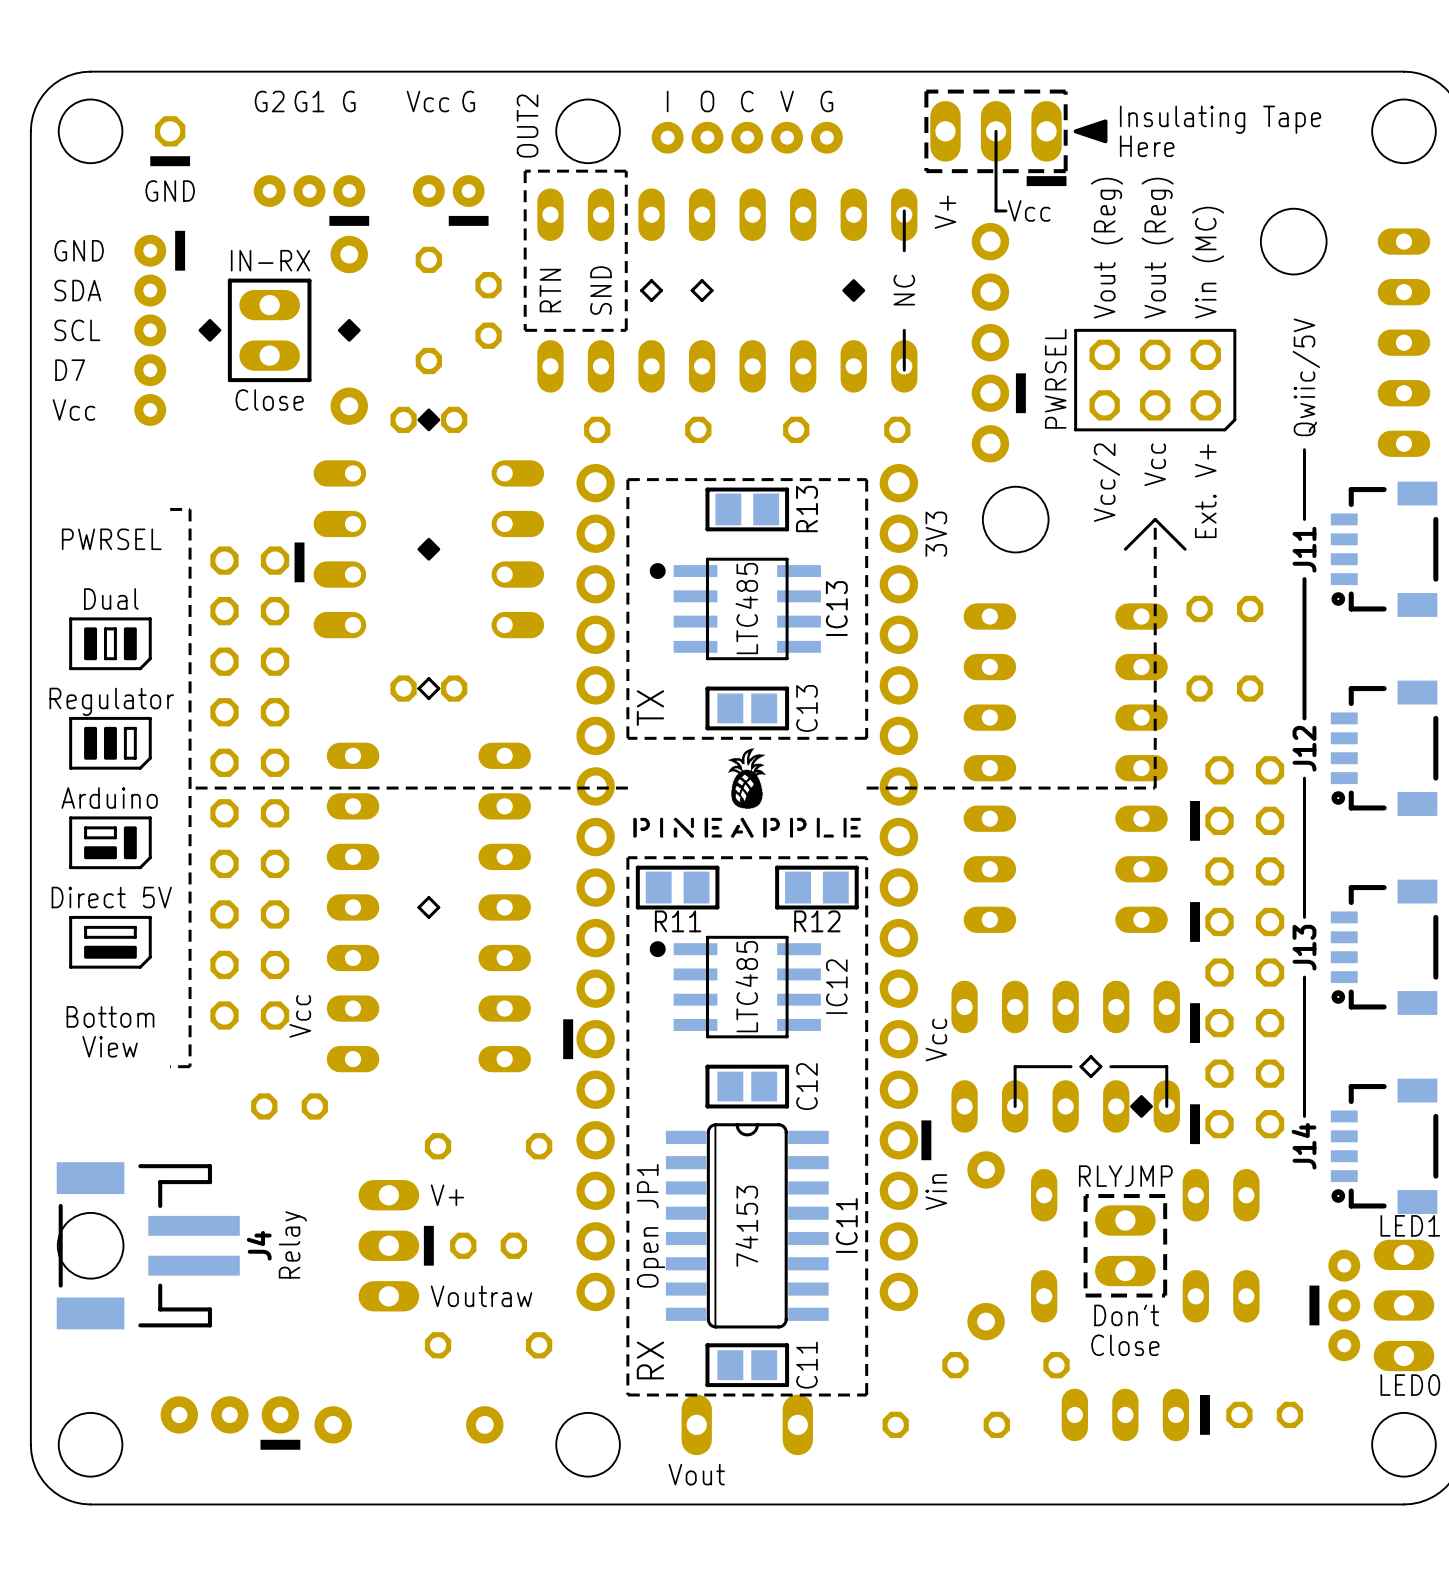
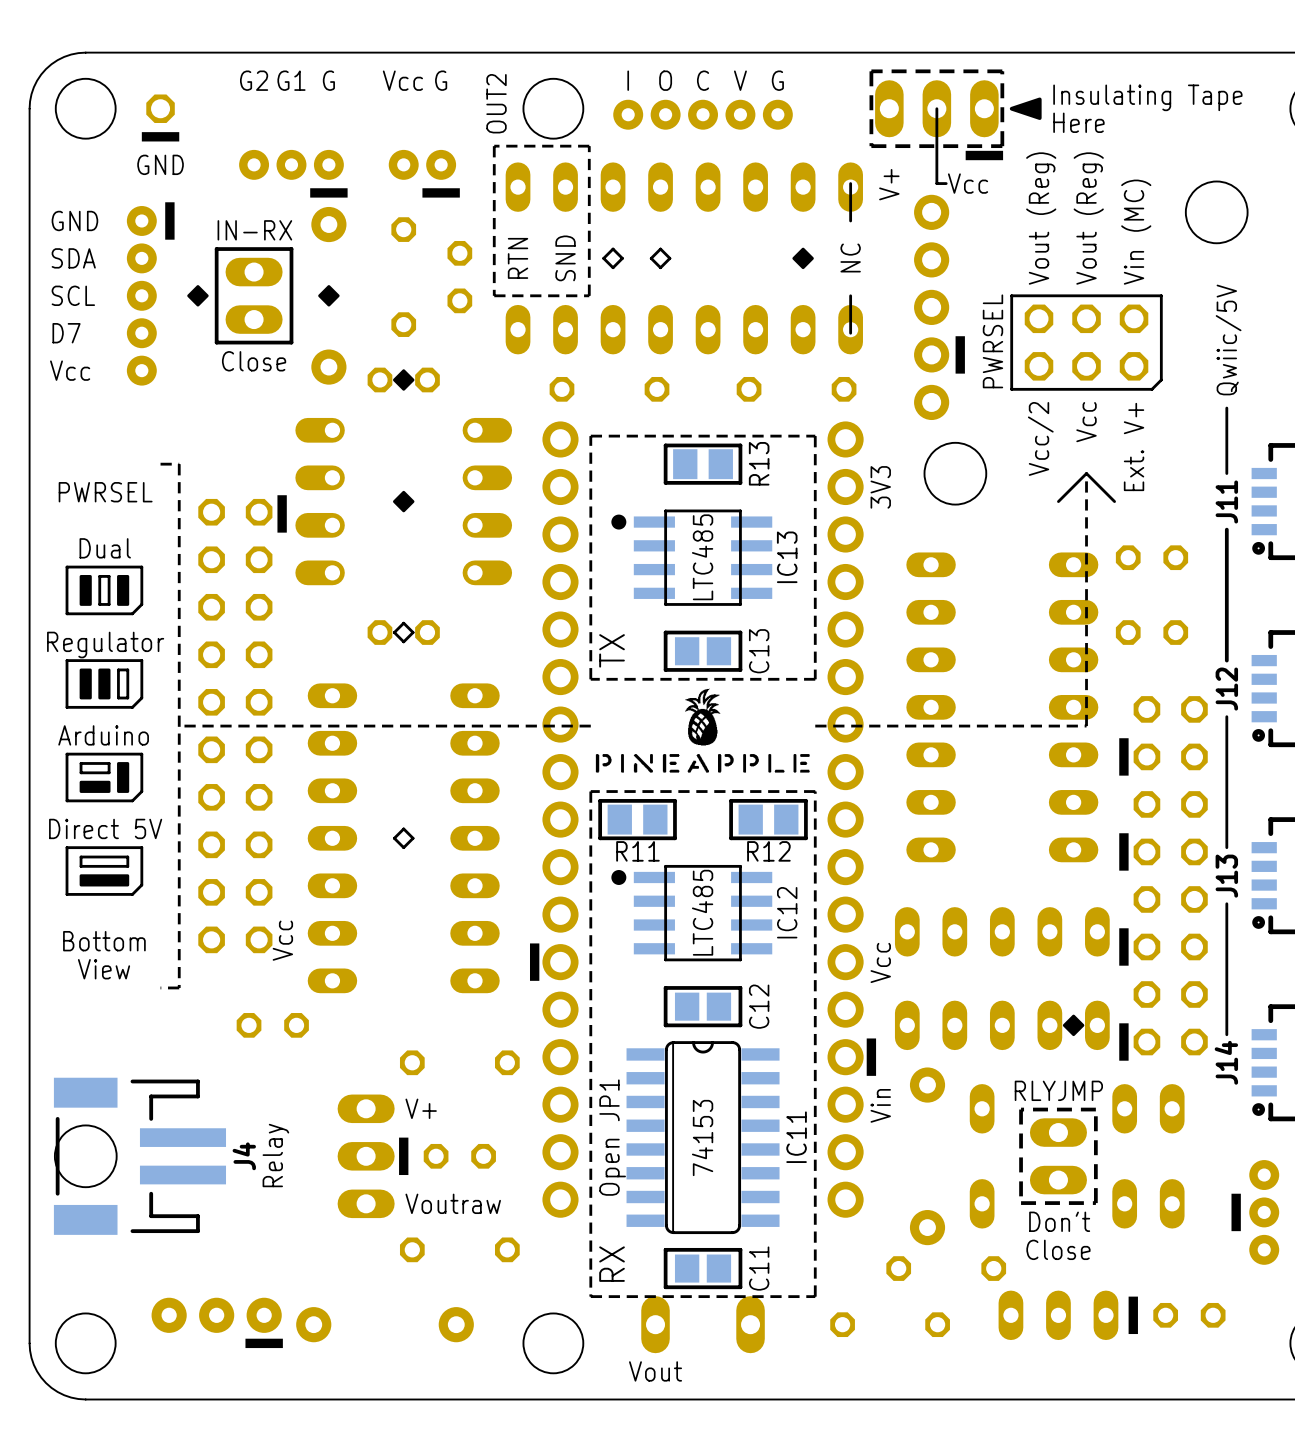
line: (1090, 1056) (1100, 1066) (1090, 1076) (1081, 1066) (1090, 1056) -> none
line: (1071, 1066) (1015, 1066) (1015, 1106) -> none
line: (1110, 1066) (1166, 1066) (1166, 1106) -> none

